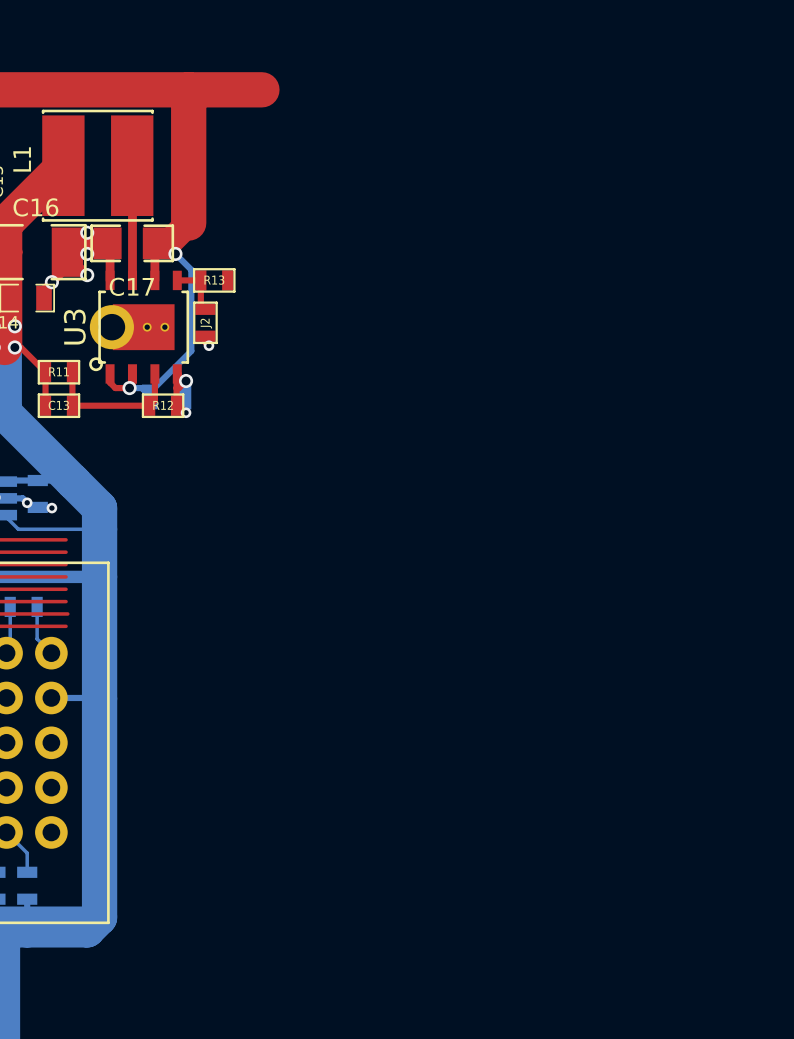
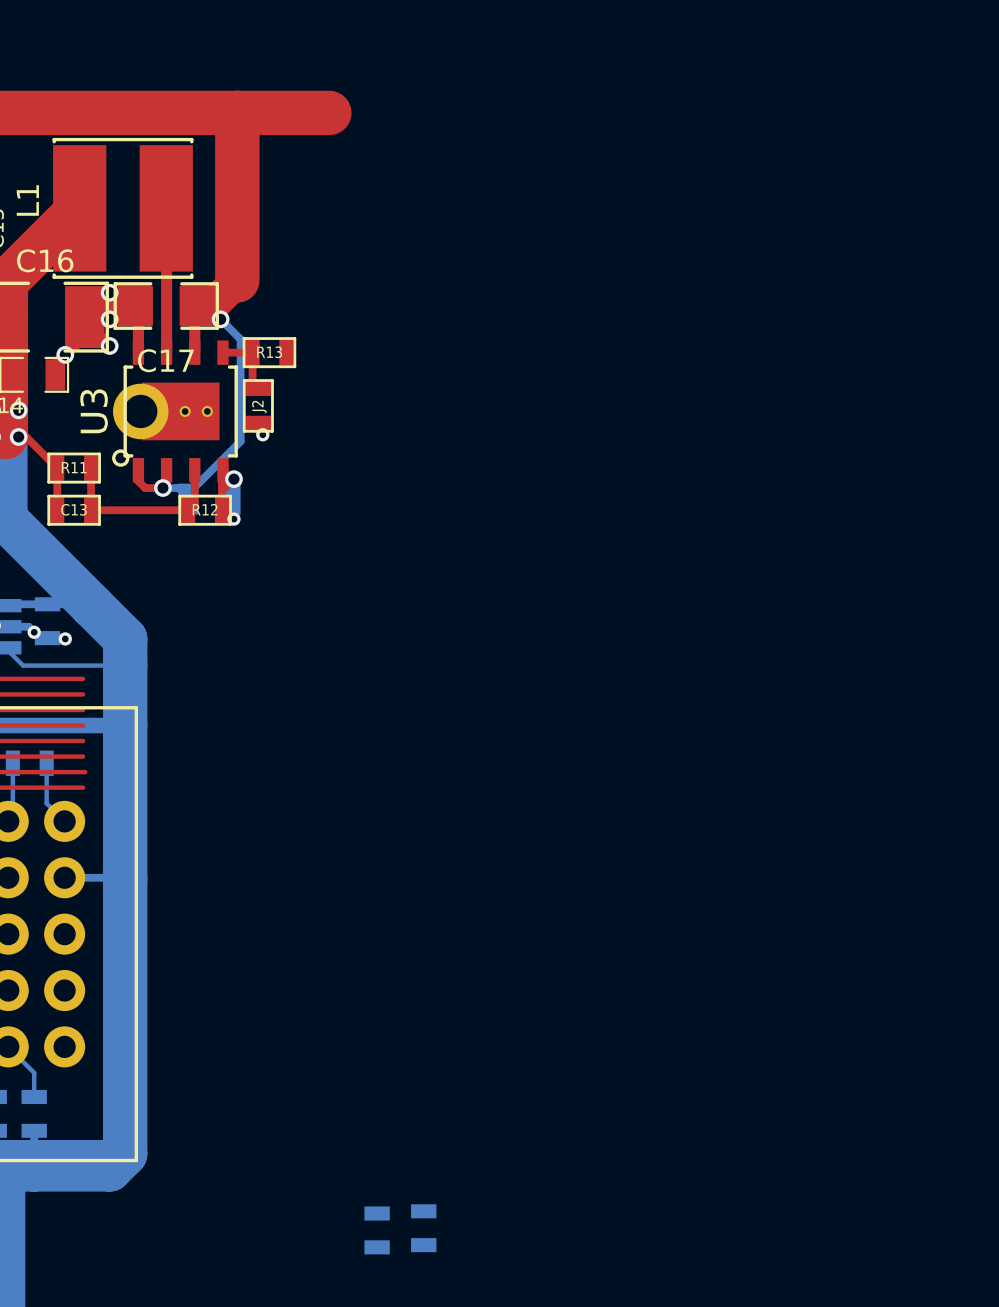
part: none -> (423, 1228)
part: none -> (377, 1230)

